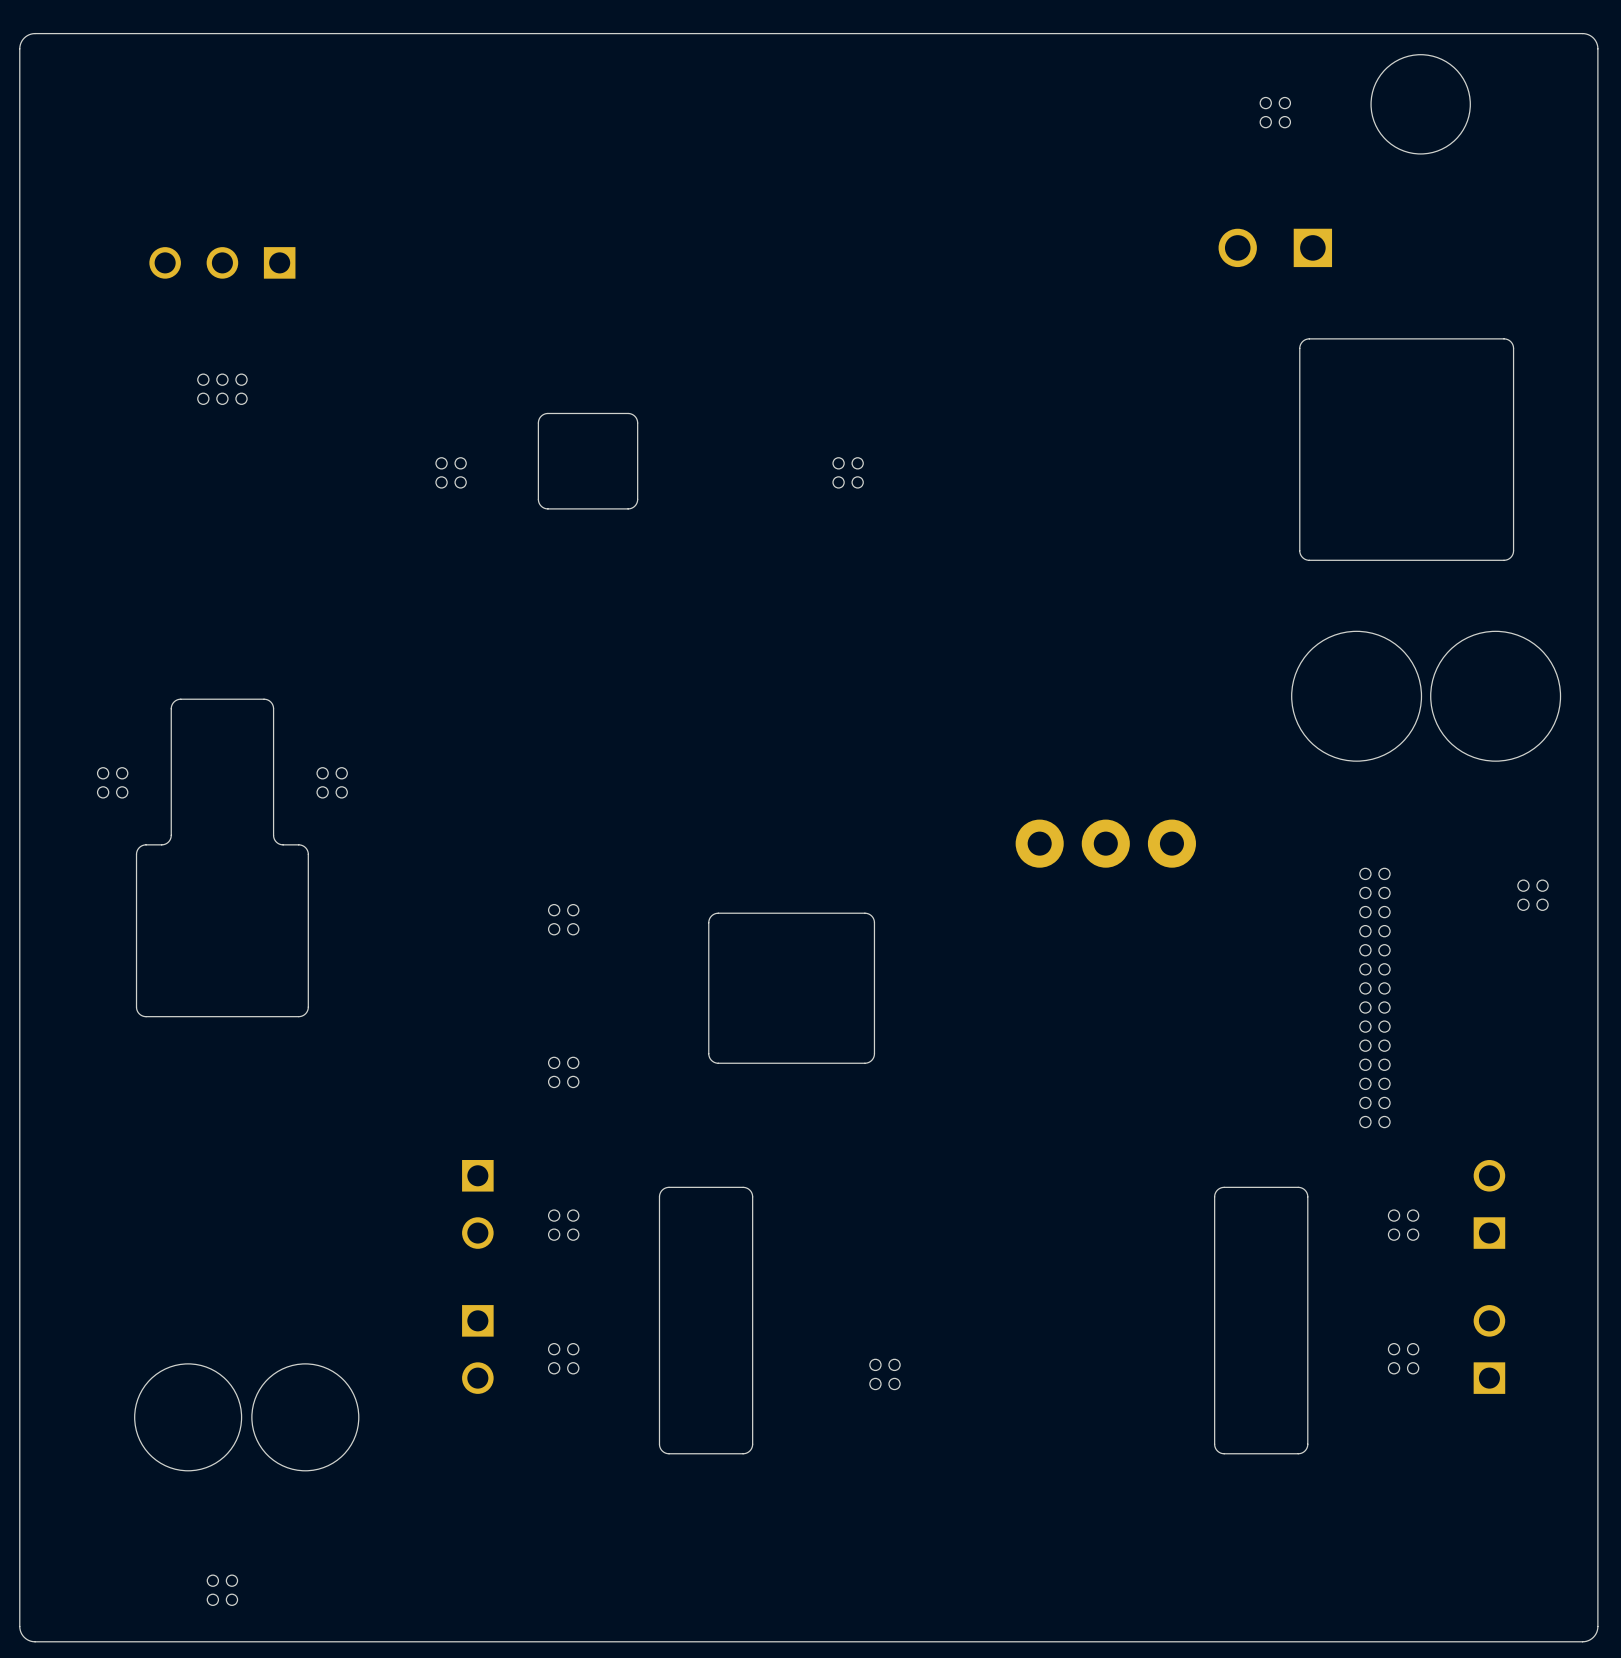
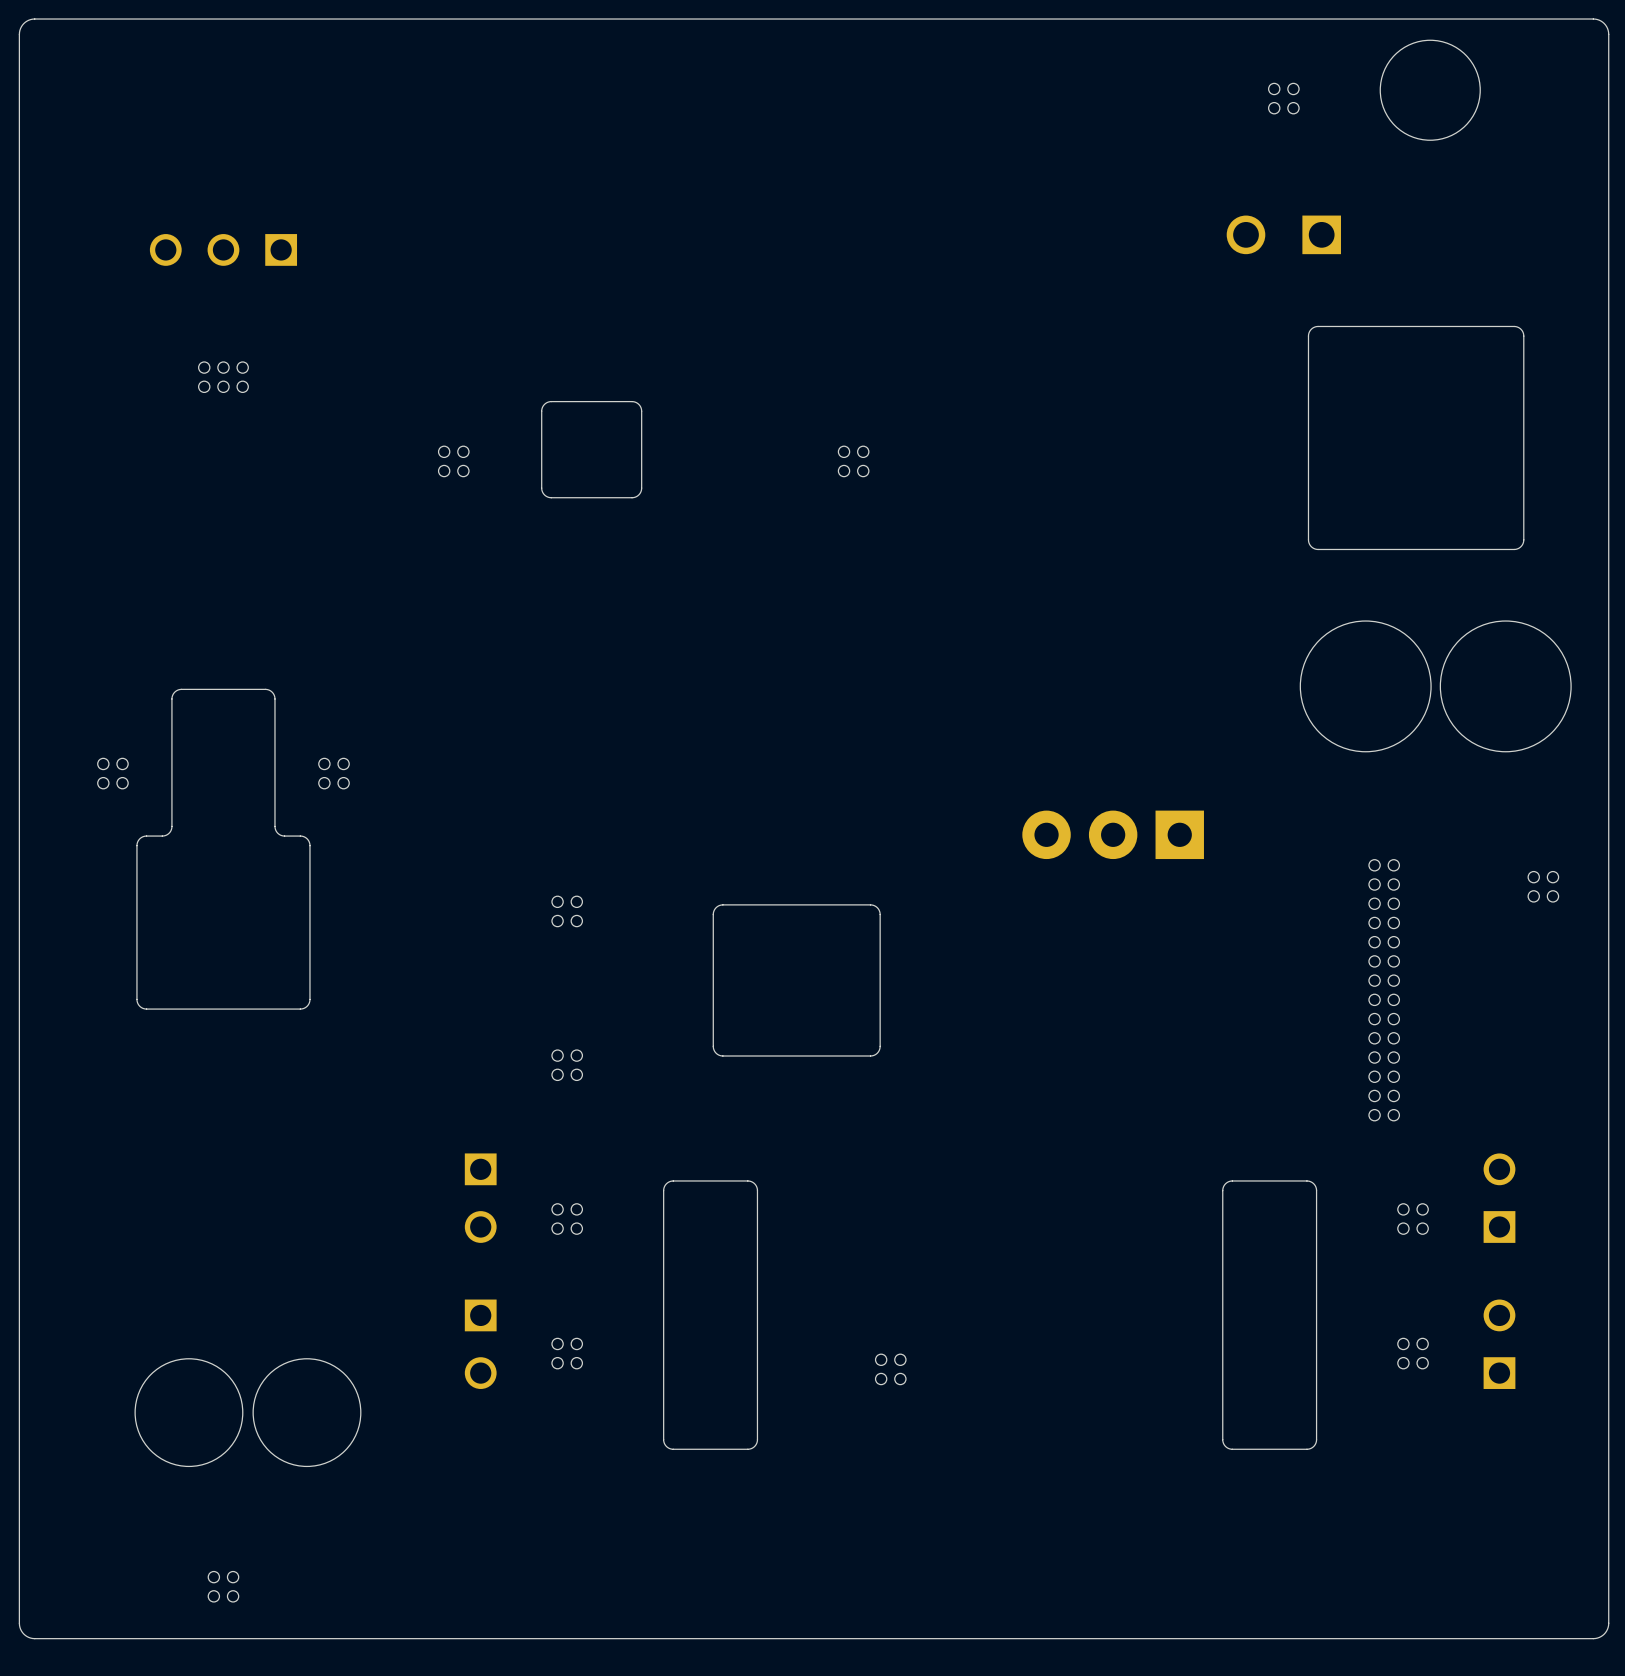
part footprint: [1015, 819, 1196, 868] -> [1022, 810, 1204, 860]

